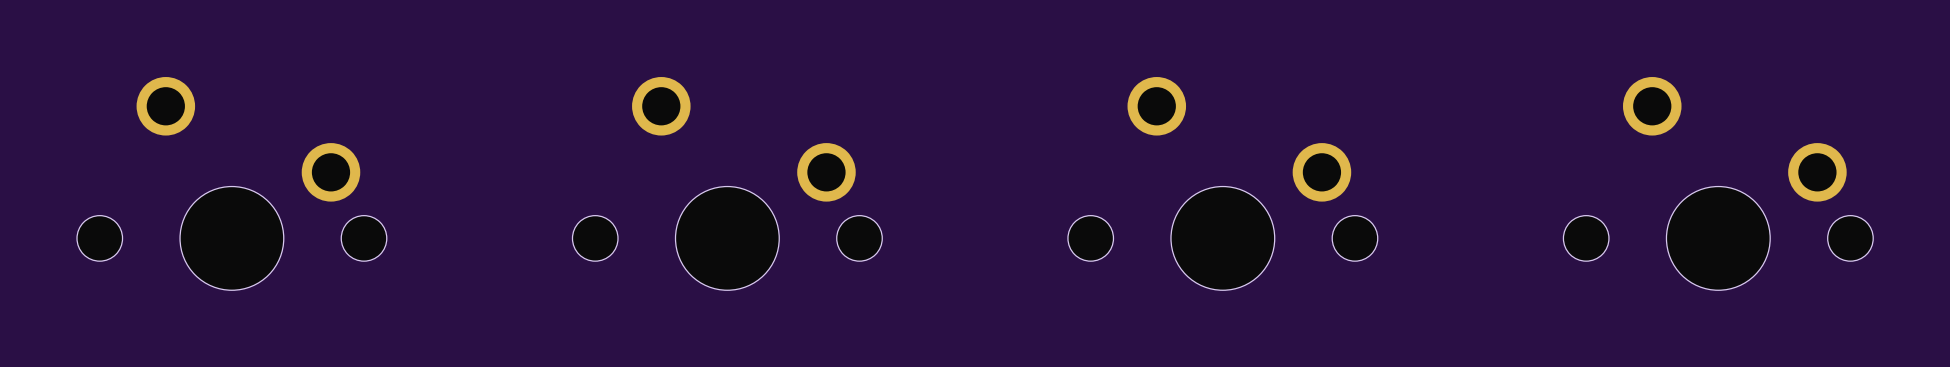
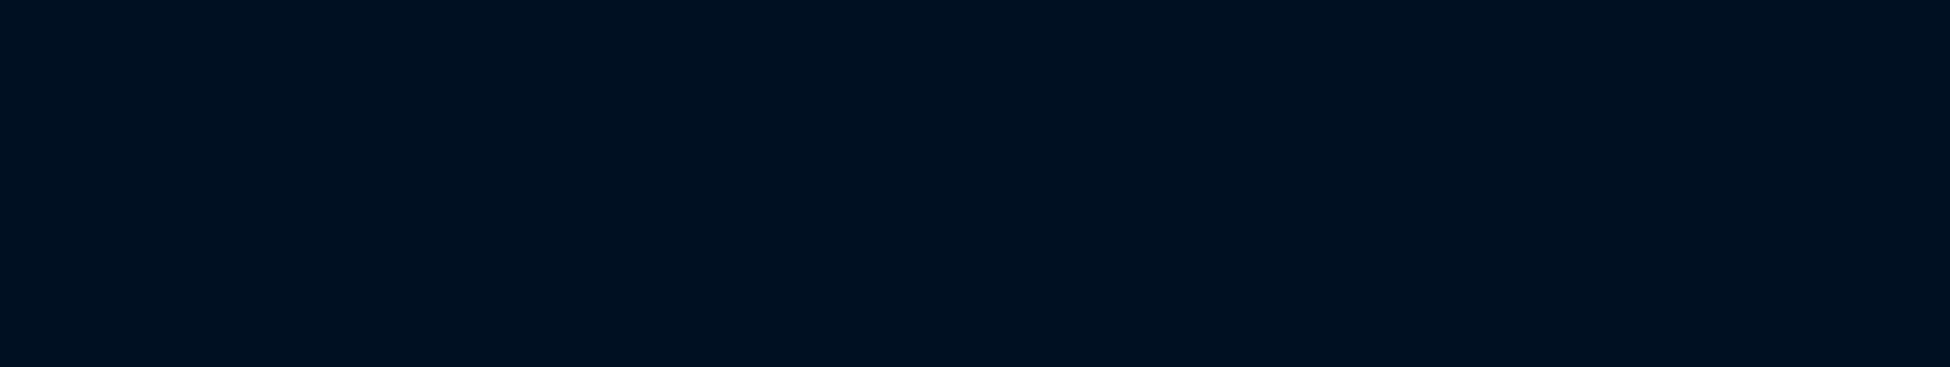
part: (231, 183) -> none
part: (727, 183) -> none
part: (1222, 183) -> none
part: (1718, 183) -> none

